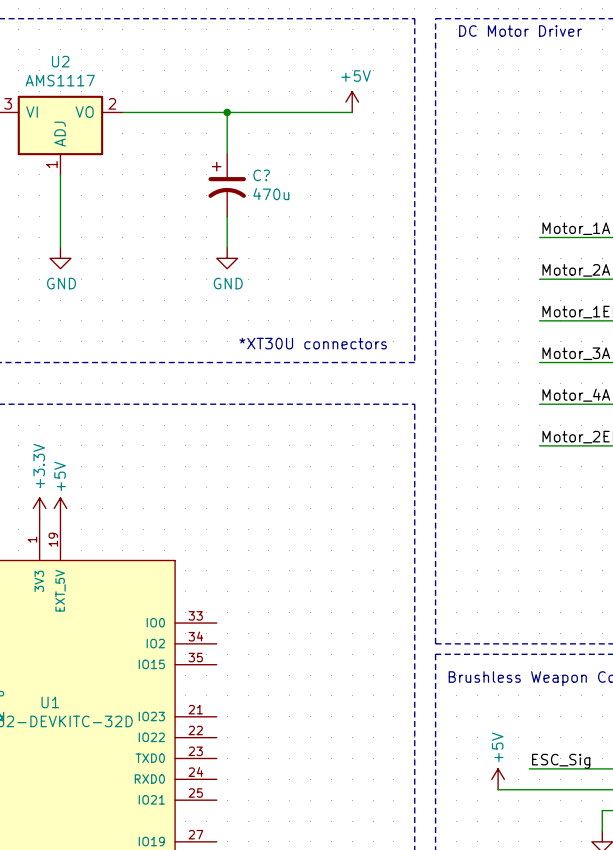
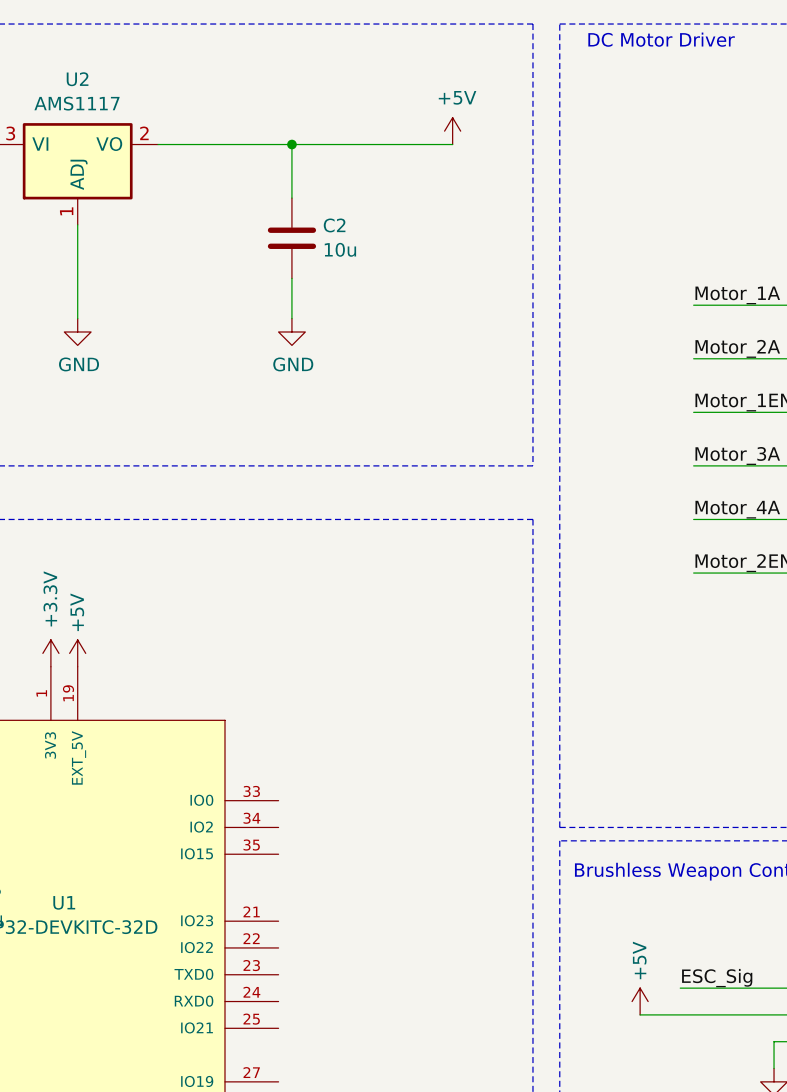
C?: 470u (227, 185) -> none
C2: none -> 10u (291, 238)
text: *XT30U connectors (313, 343) -> none

